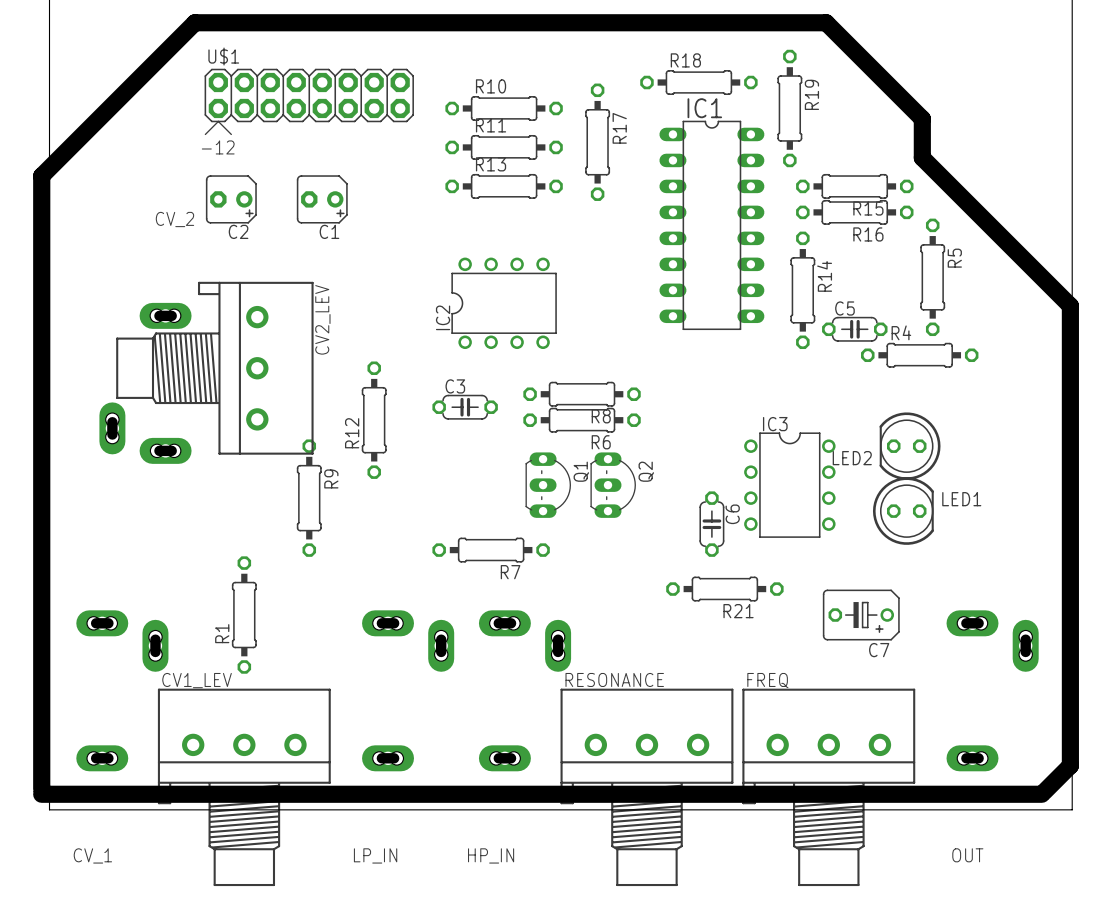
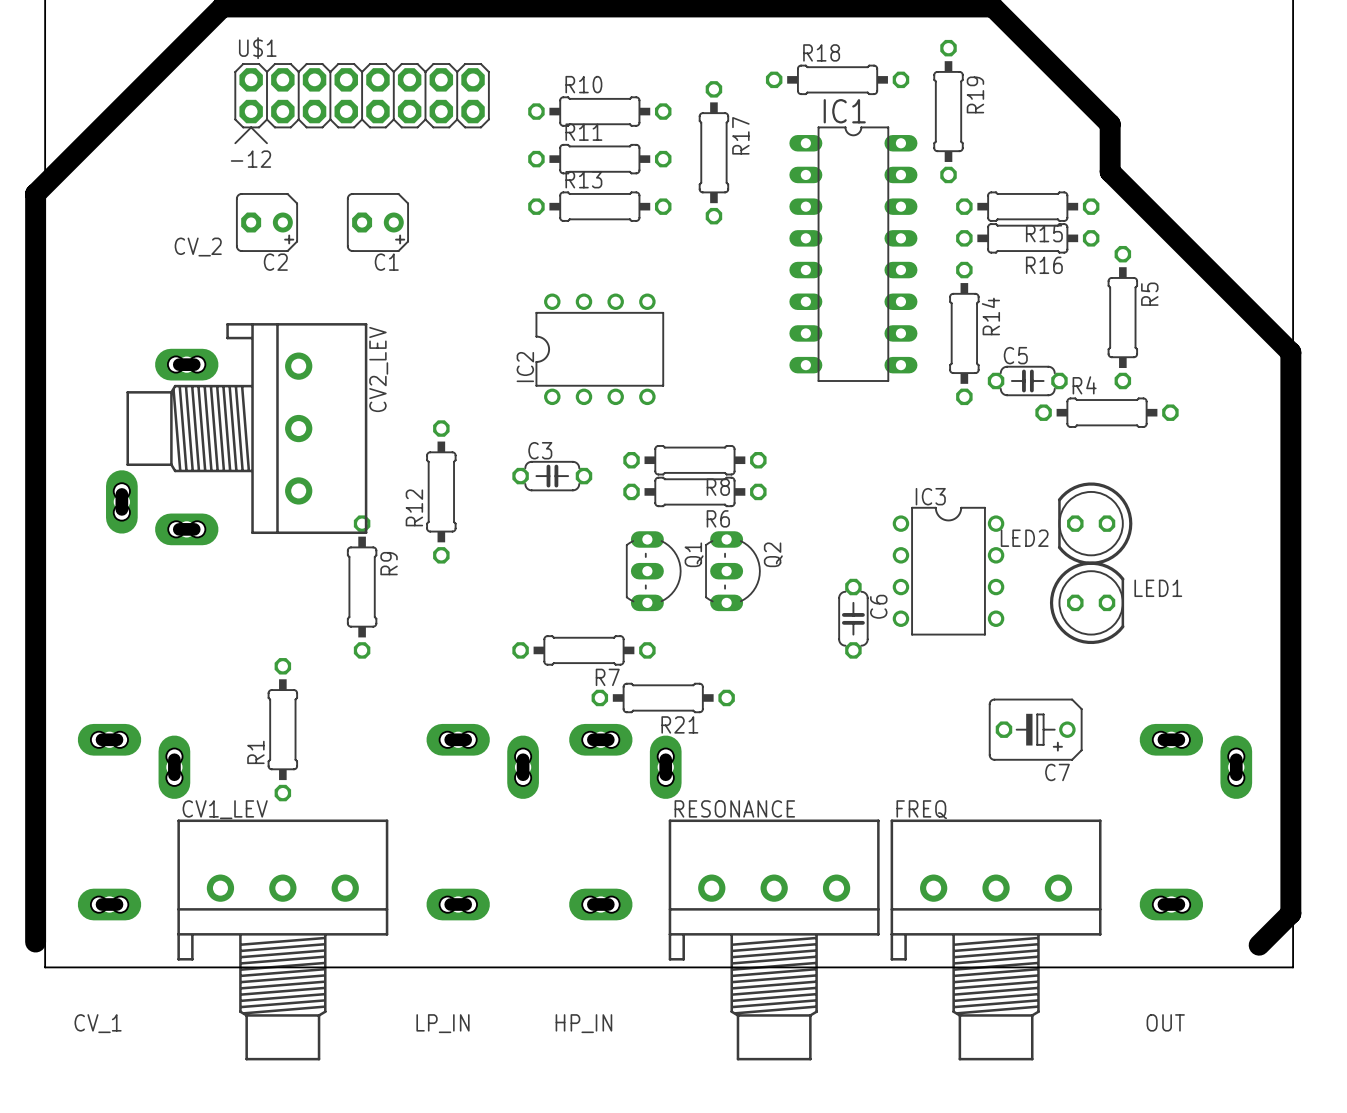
R21 position: (724, 589) -> (663, 697)
board edge: (41, 794) (1041, 794) -> none

